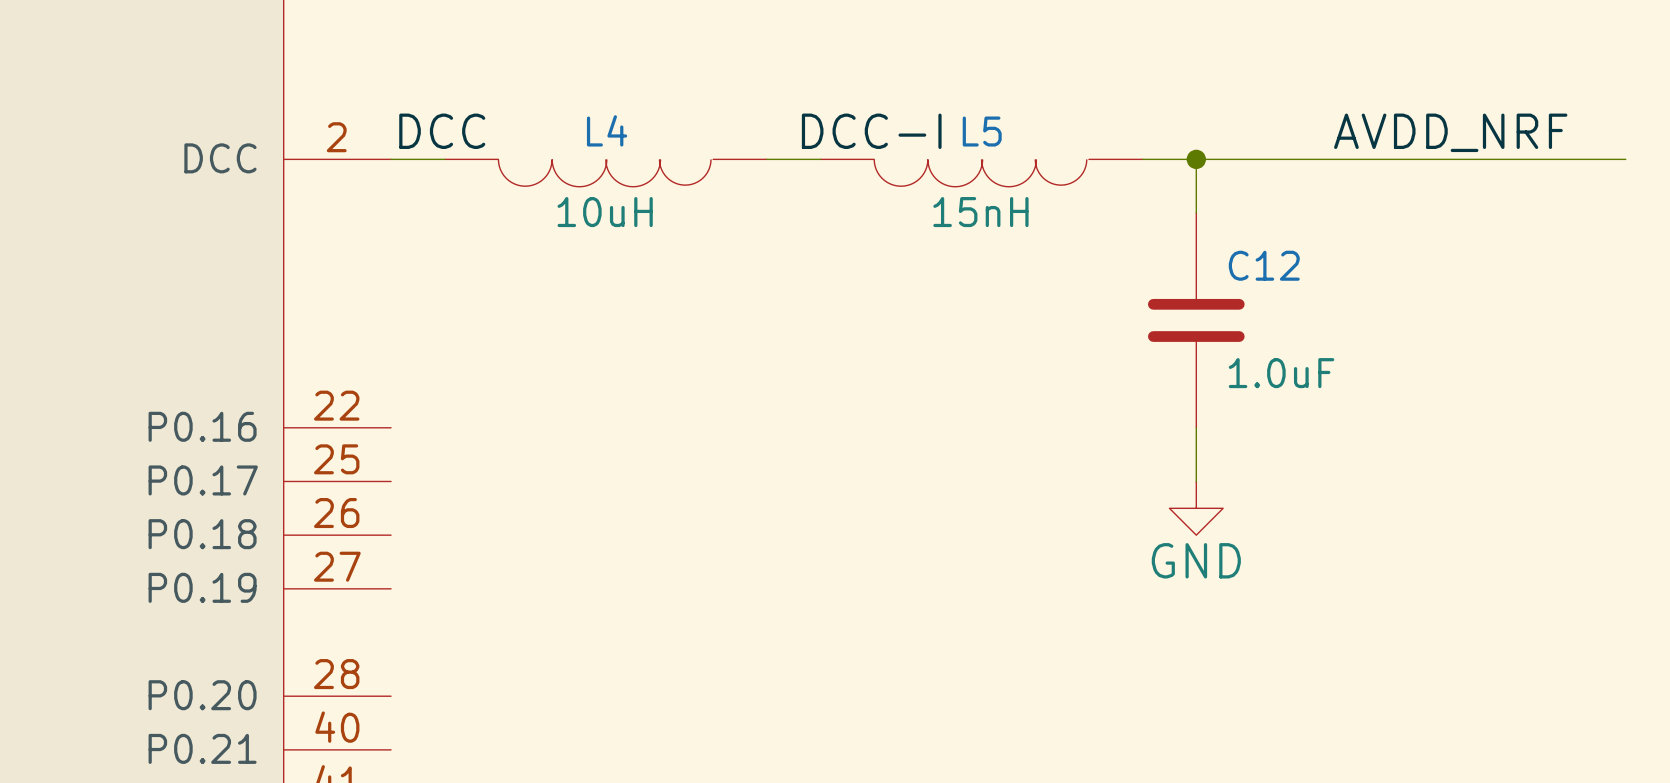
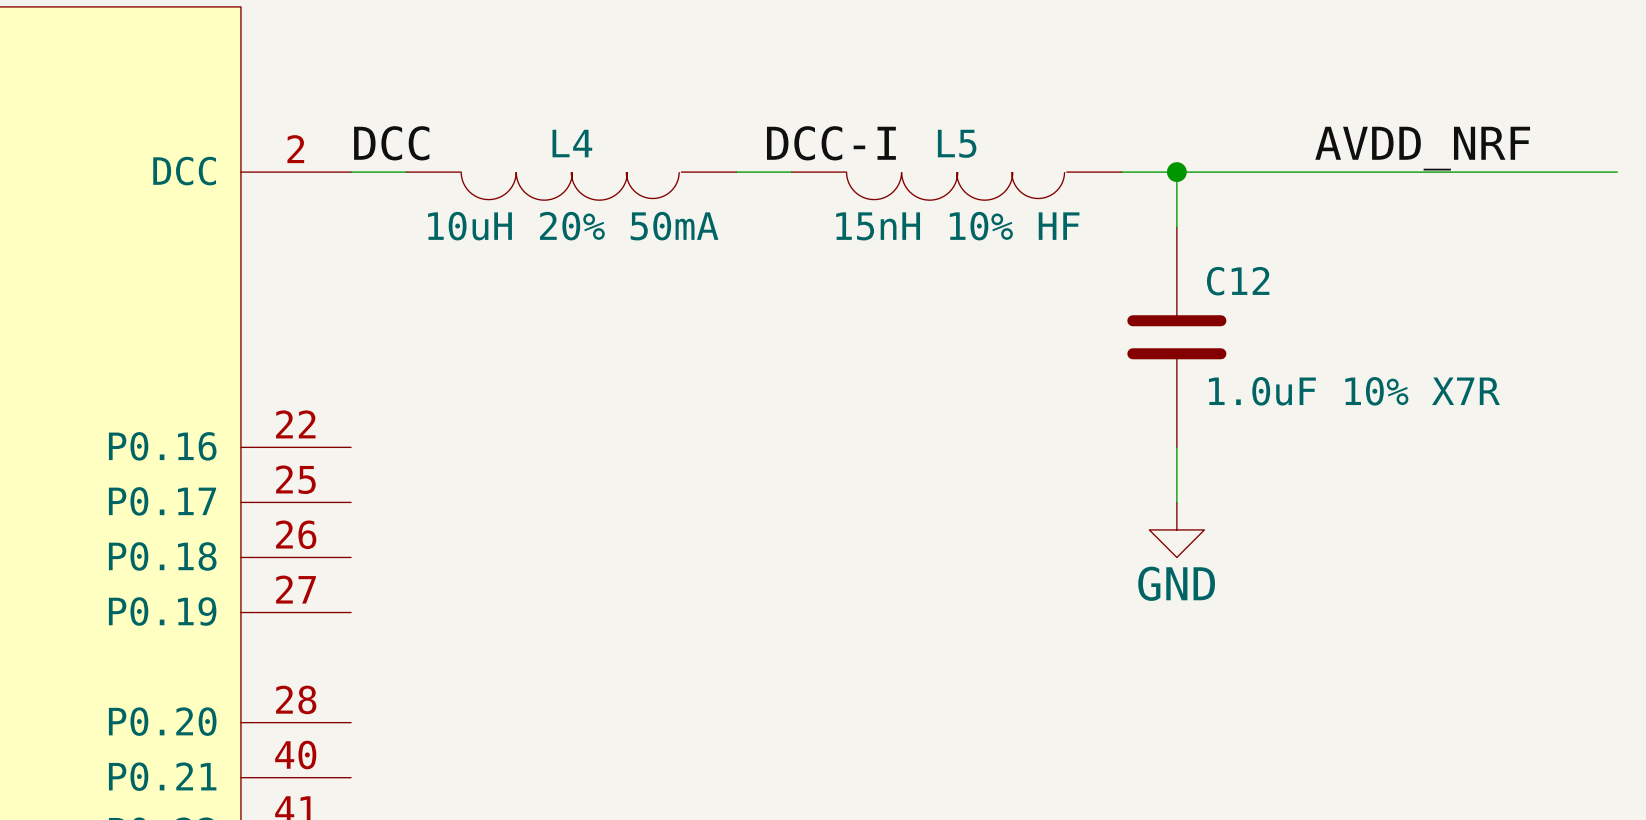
L4 value: 10uH (605, 212) -> 10uH 20% 50mA (573, 226)
L5 value: 15nH (980, 212) -> 15nH 10% HF (957, 226)
C12 value: 1.0uF (1281, 373) -> 1.0uF 10% X7R (1354, 391)

